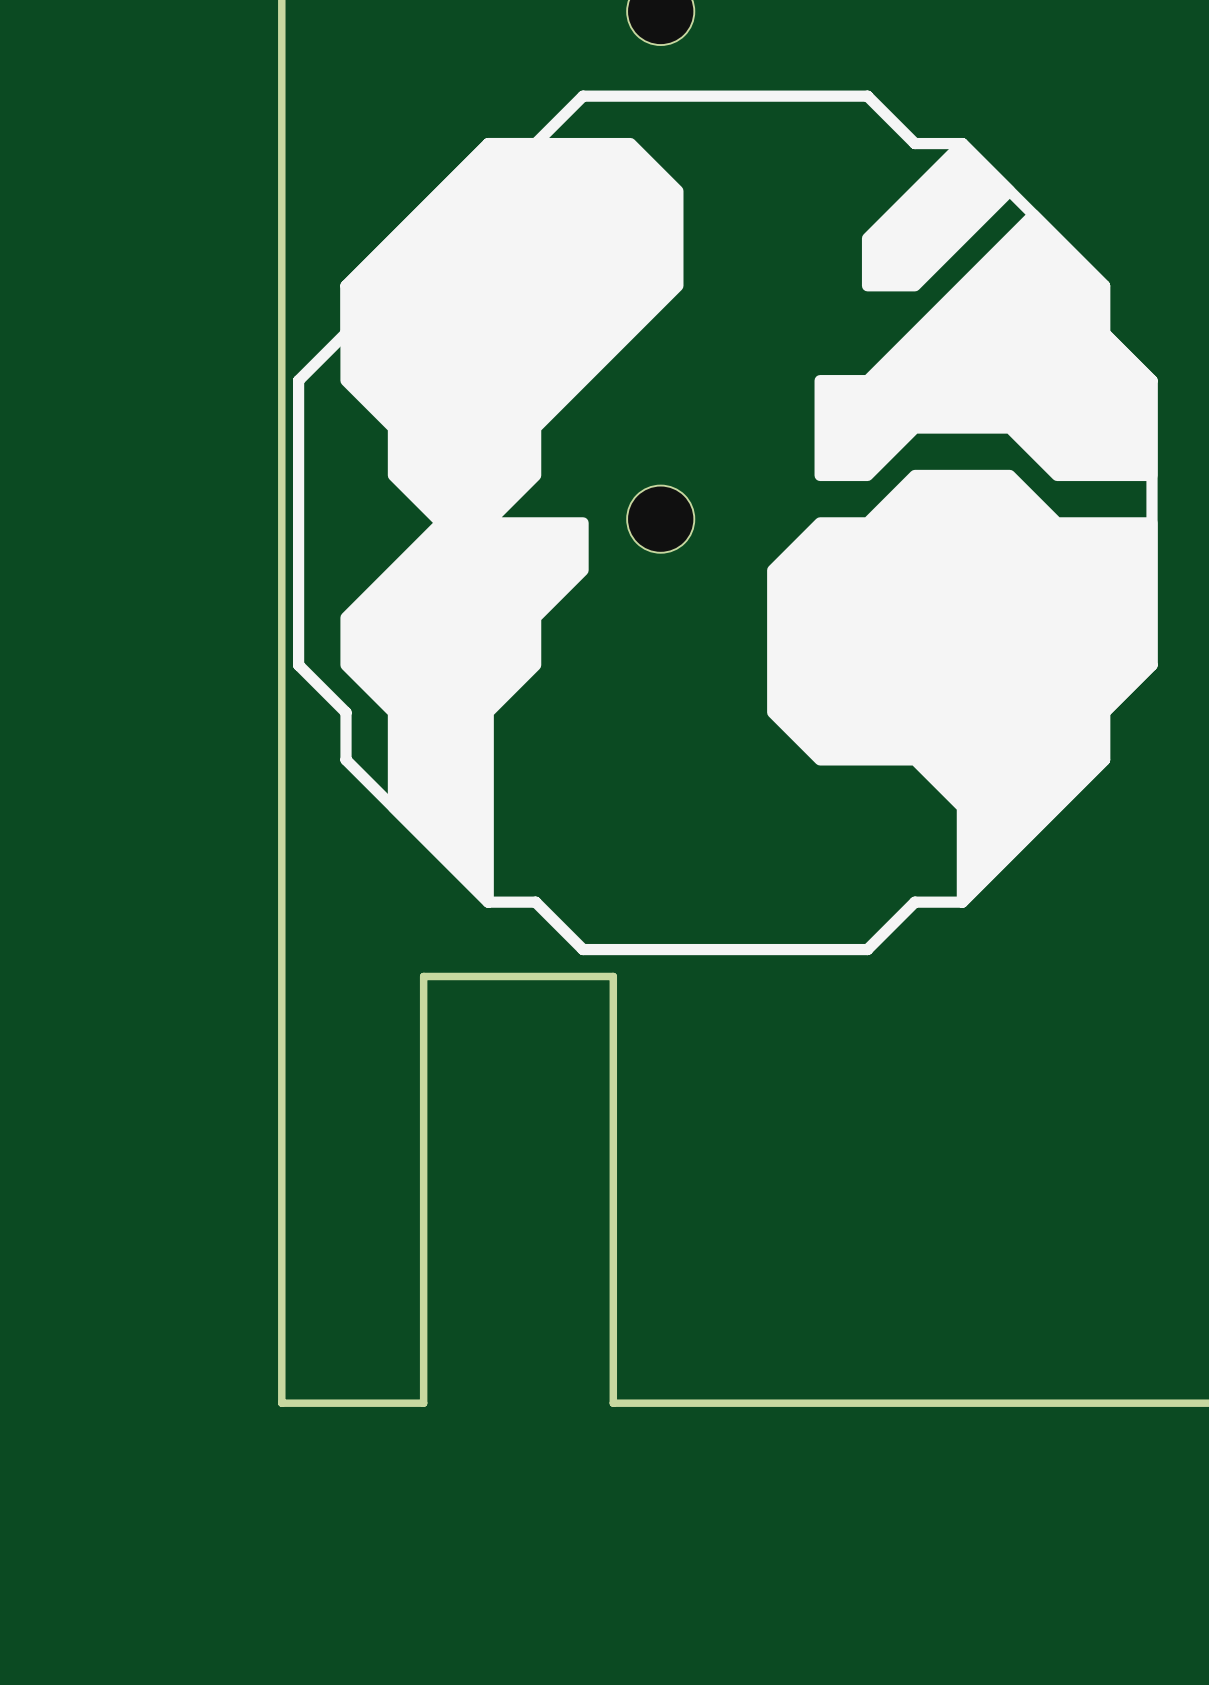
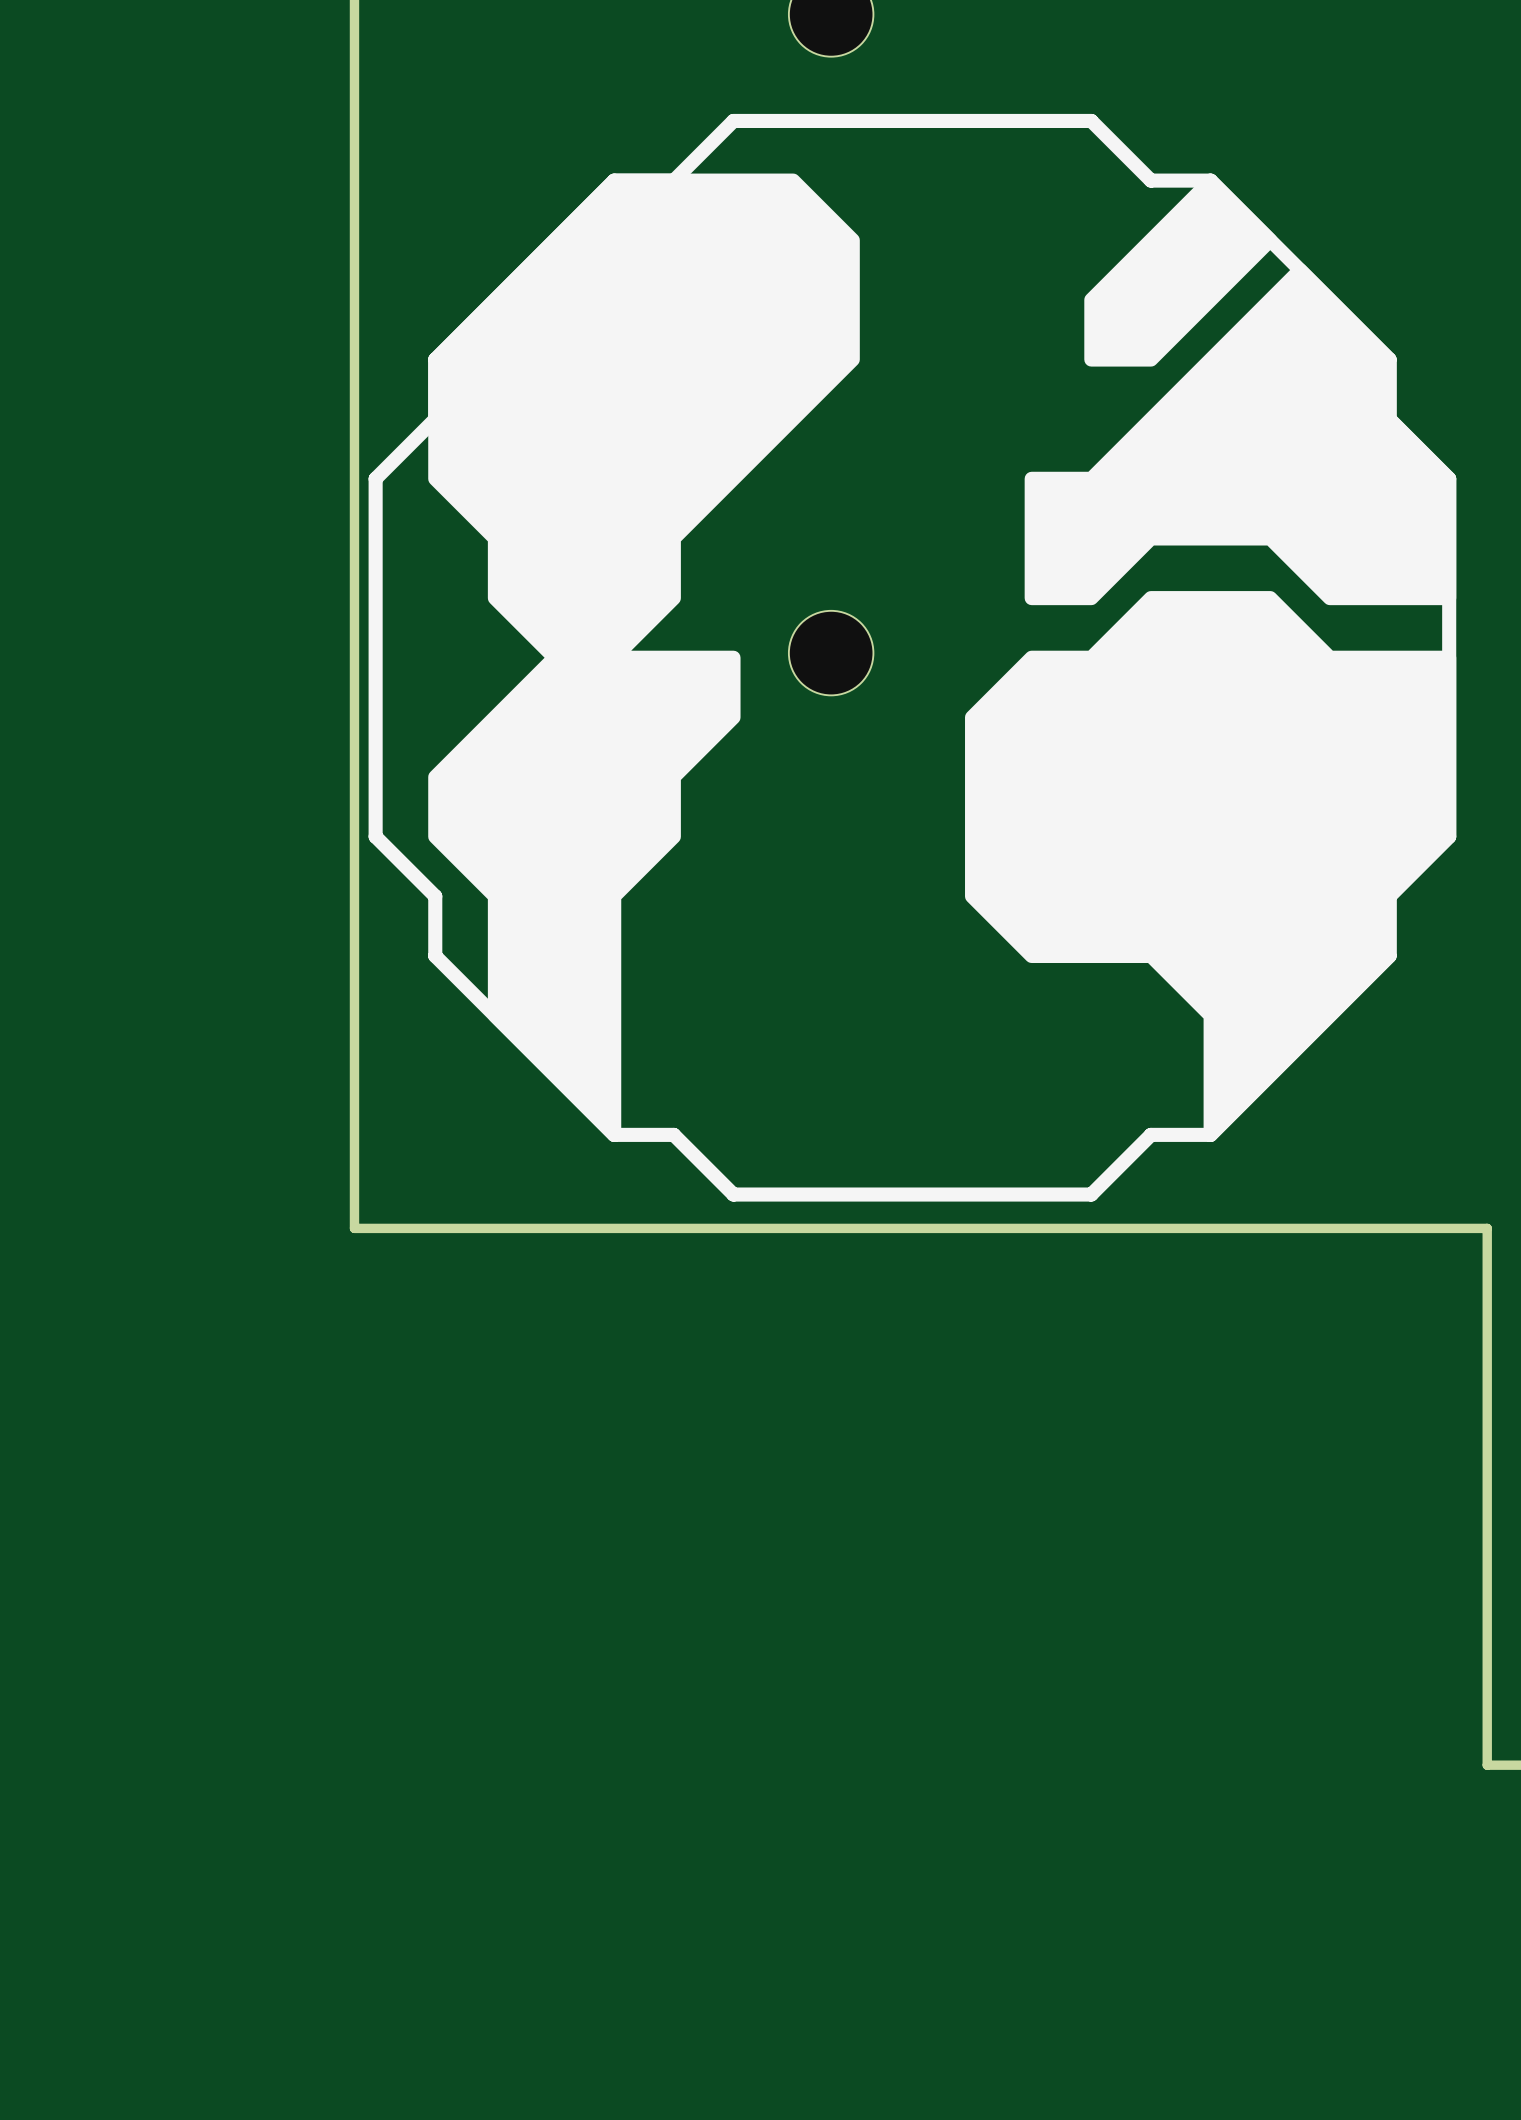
board edge: (423, 976) (423, 1403) (281, 1403) (281, 976) -> (532, 1228) (354, 1228)
board edge: (613, 976) (613, 1403) (1182, 1403) -> (771, 1228) (1487, 1228) (1487, 1765)

